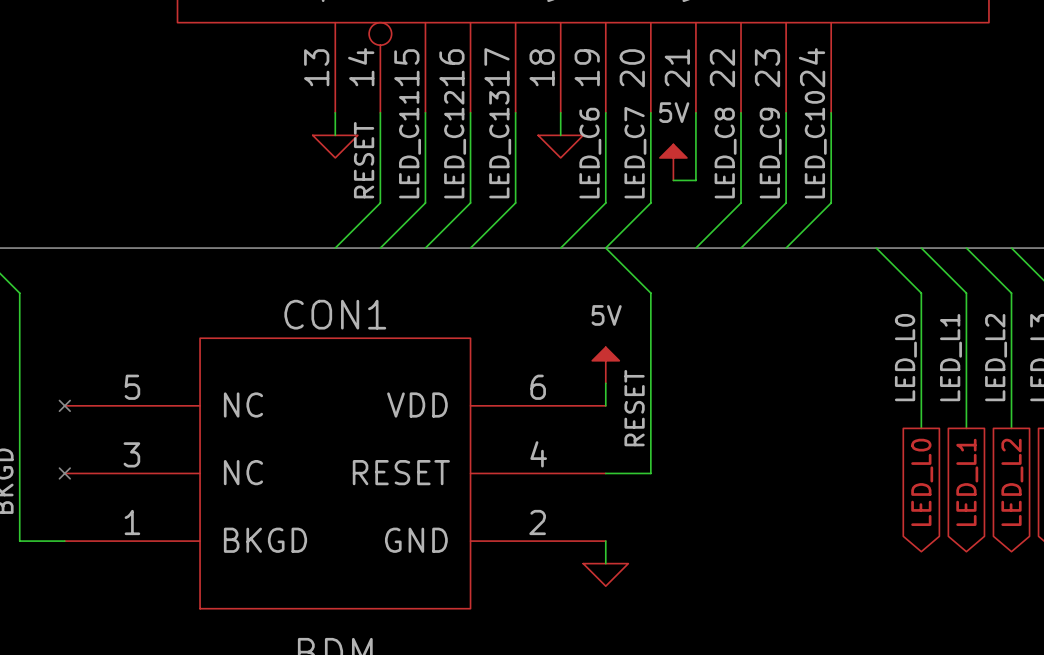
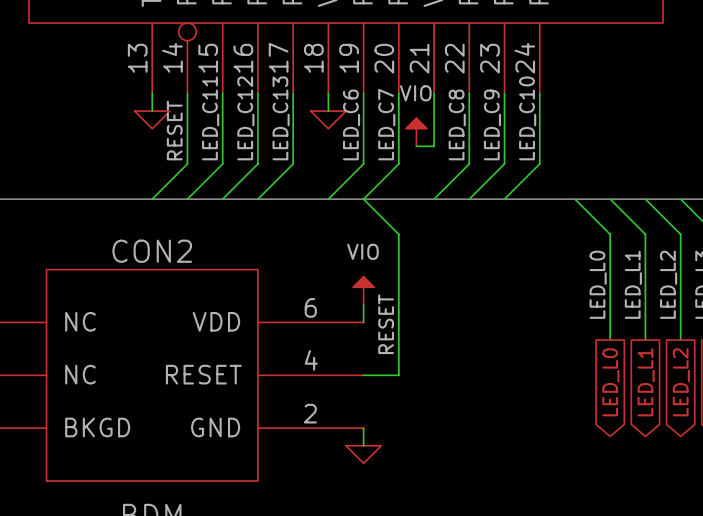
power symbol: 5V (673, 162) -> VIO (416, 132)
CON1 name: CON1 (335, 314) -> CON2 (152, 251)
power symbol: 5V (605, 365) -> VIO (363, 290)

